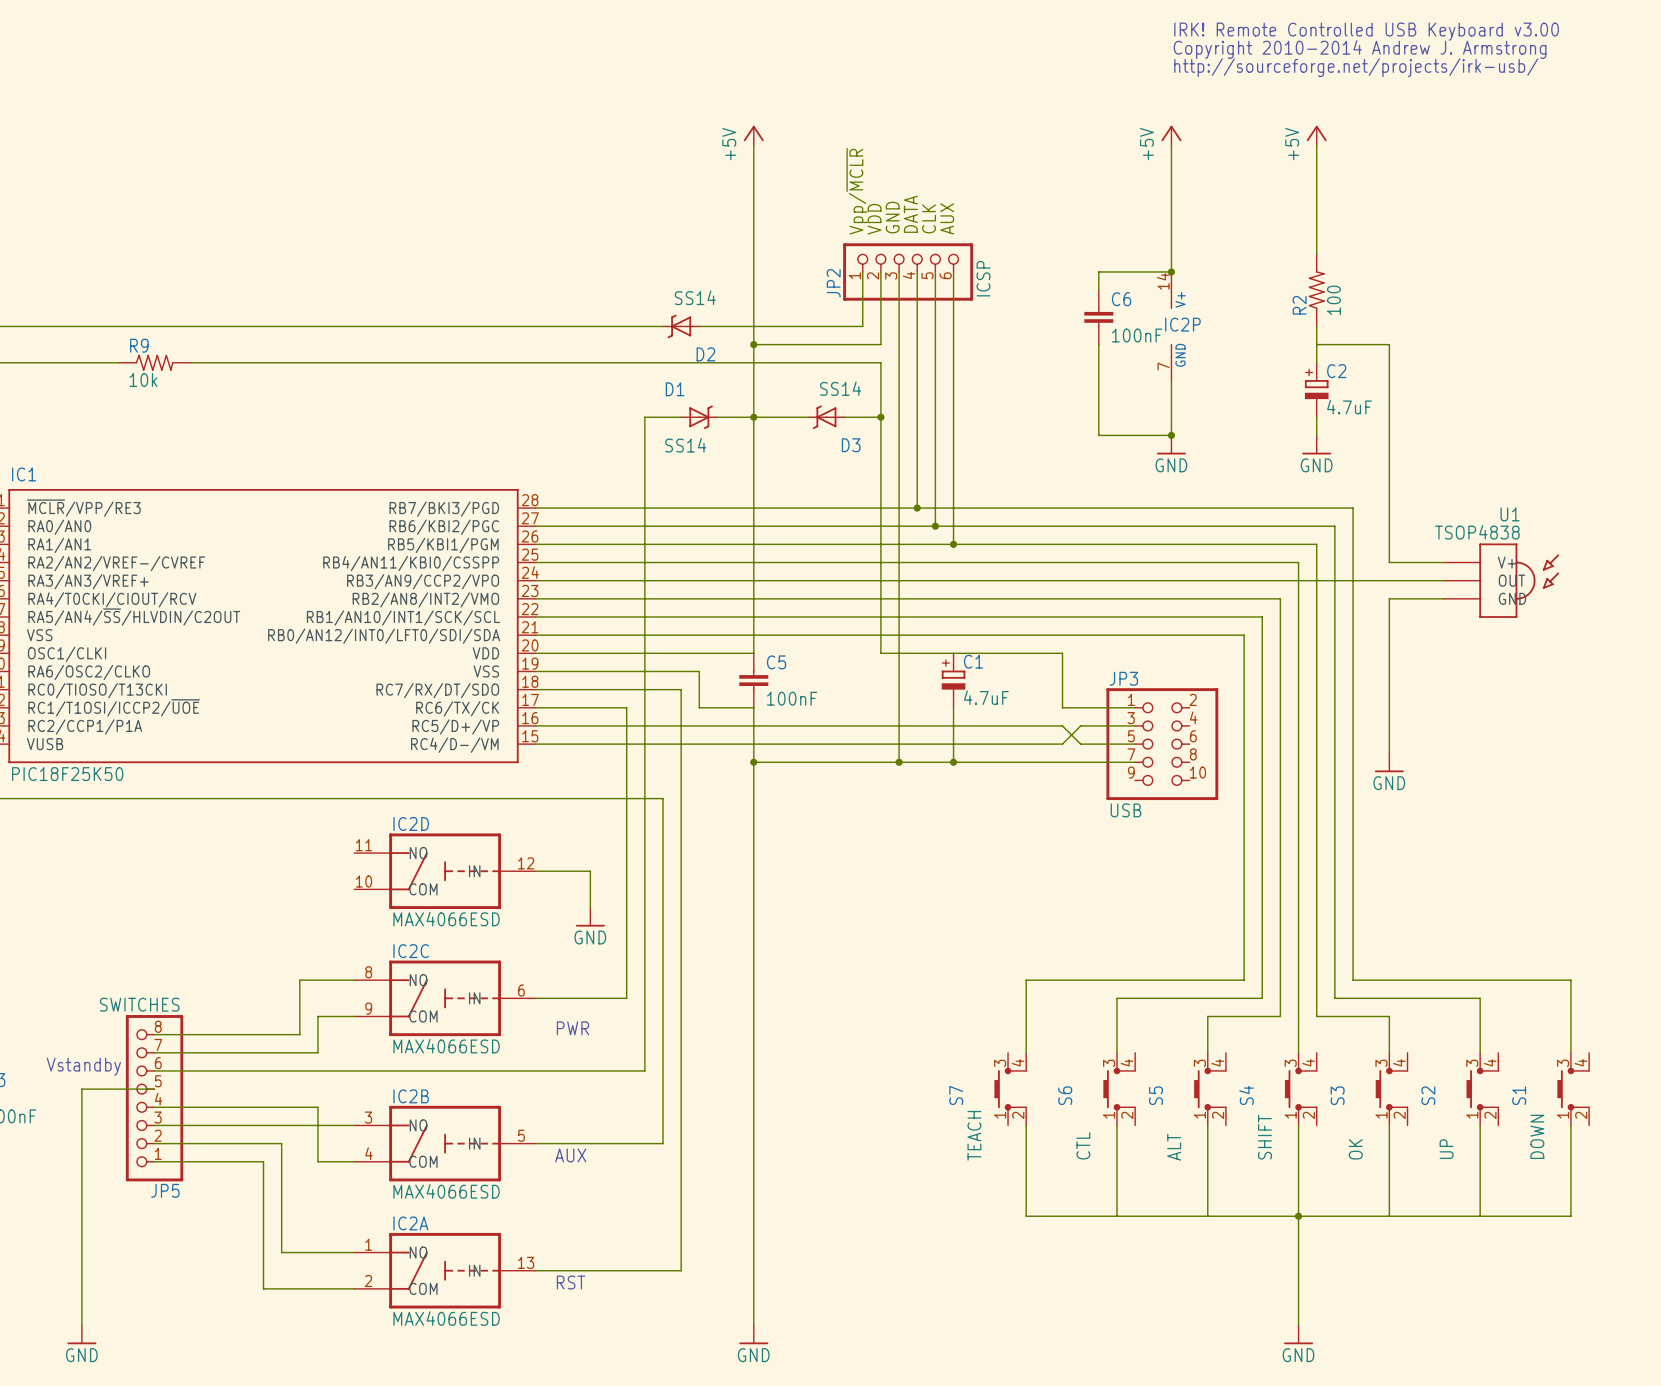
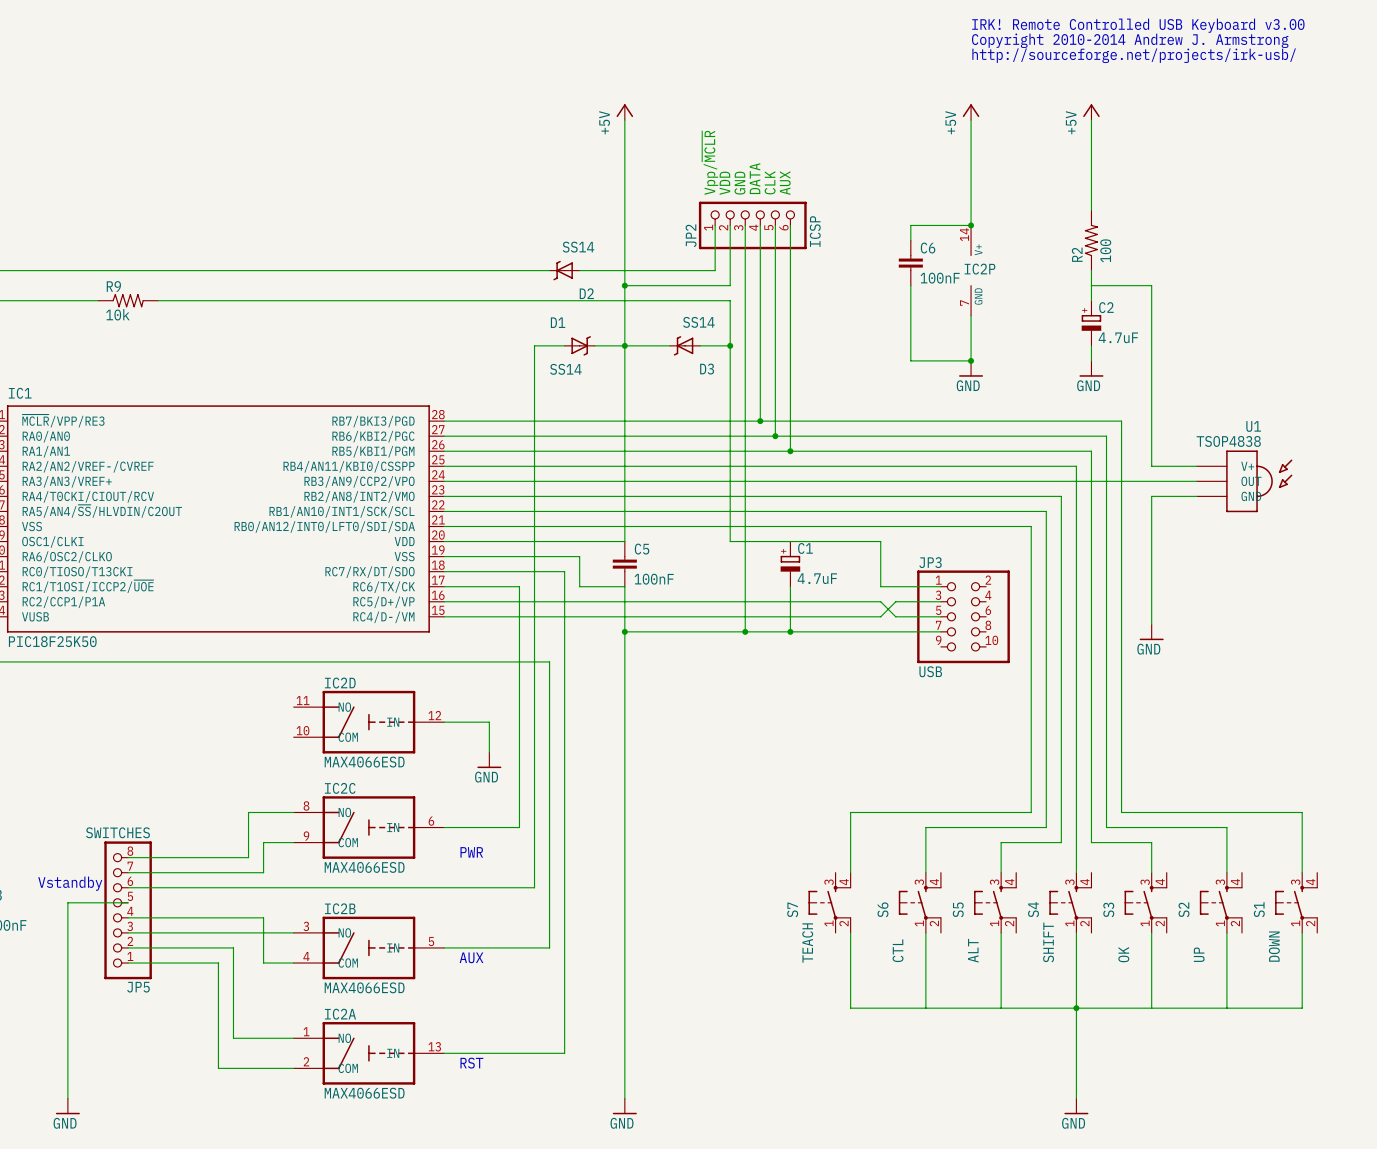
S7 symbol: [994, 1052, 1027, 1126] -> [808, 872, 852, 933]
S6 symbol: [1103, 1052, 1136, 1126] -> [898, 872, 942, 933]
S5 symbol: [1194, 1052, 1227, 1126] -> [974, 872, 1017, 933]
S4 symbol: [1284, 1052, 1318, 1126] -> [1049, 872, 1092, 933]
S3 symbol: [1375, 1052, 1409, 1126] -> [1124, 872, 1168, 933]
S2 symbol: [1466, 1052, 1499, 1126] -> [1199, 872, 1243, 933]
S1 symbol: [1557, 1052, 1590, 1126] -> [1275, 872, 1318, 933]

